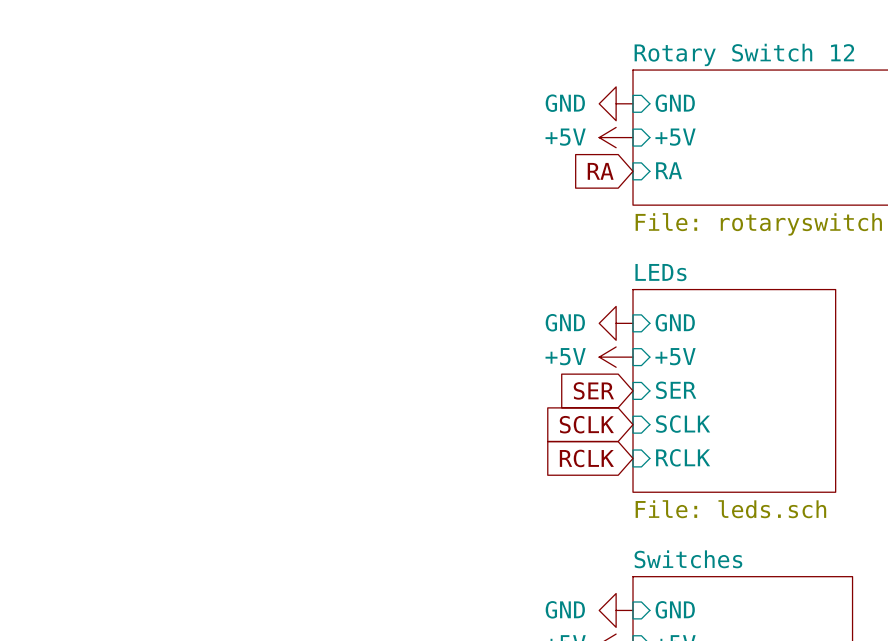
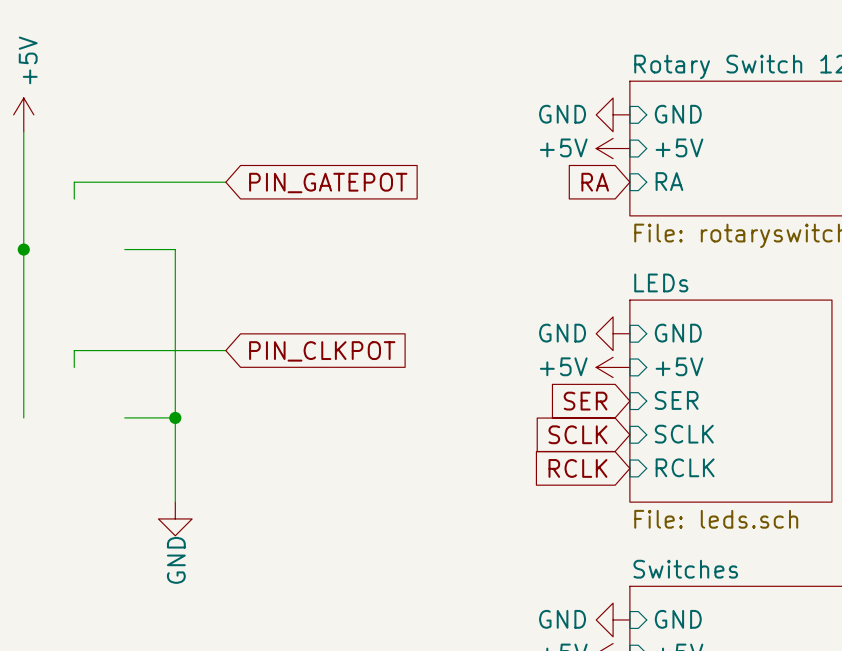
power symbol: none -> +5V (23, 114)
wire: none -> (23, 131) (23, 417)
wire: none -> (225, 182) (74, 182) (74, 199)
global label: none -> PIN_GATEPOT (328, 183)
junction: none -> (23, 249)
wire: none -> (124, 249) (175, 249) (175, 502)
wire: none -> (225, 350) (74, 350) (74, 367)
global label: none -> PIN_CLKPOT (322, 351)
wire: none -> (124, 417) (175, 417)
junction: none -> (175, 417)
power symbol: none -> GND (175, 518)

